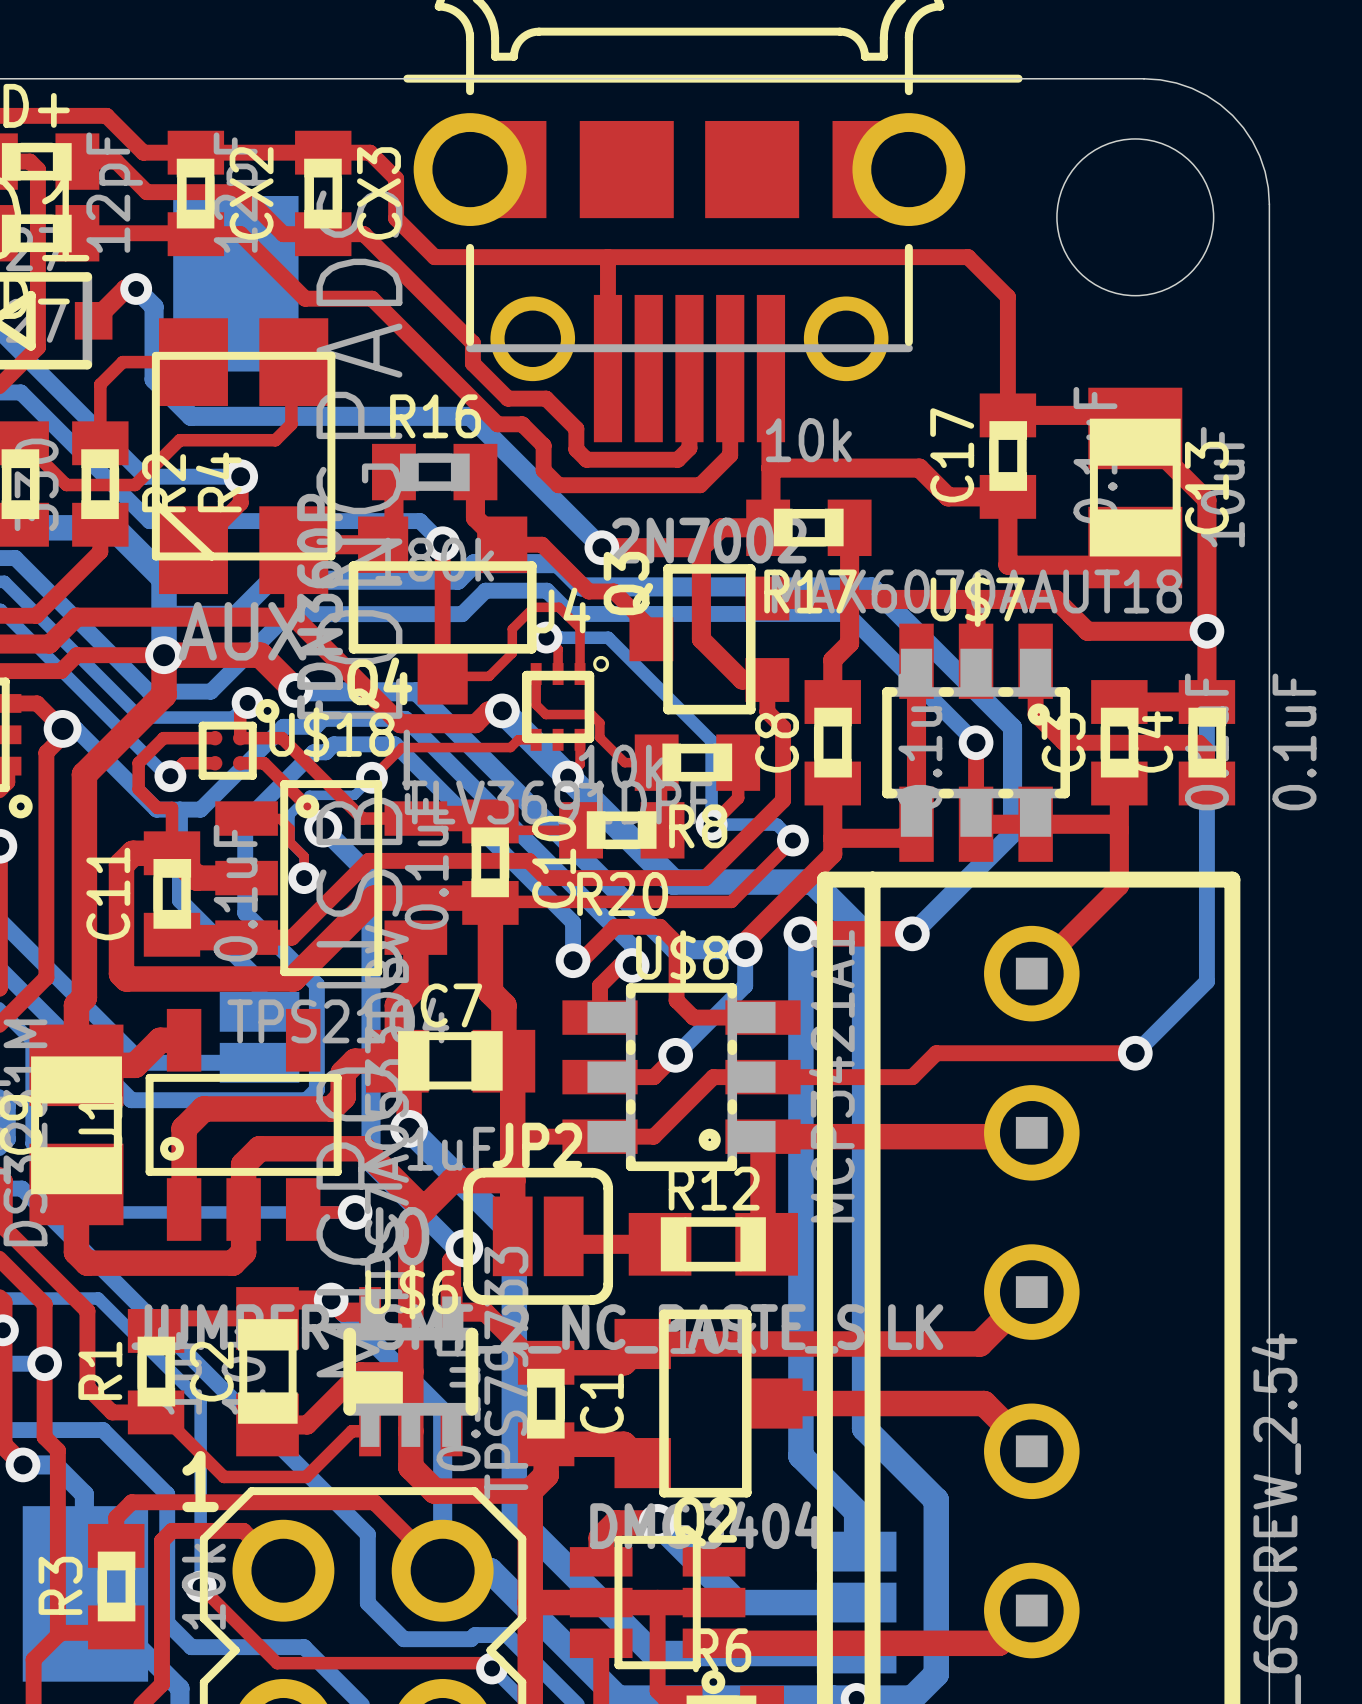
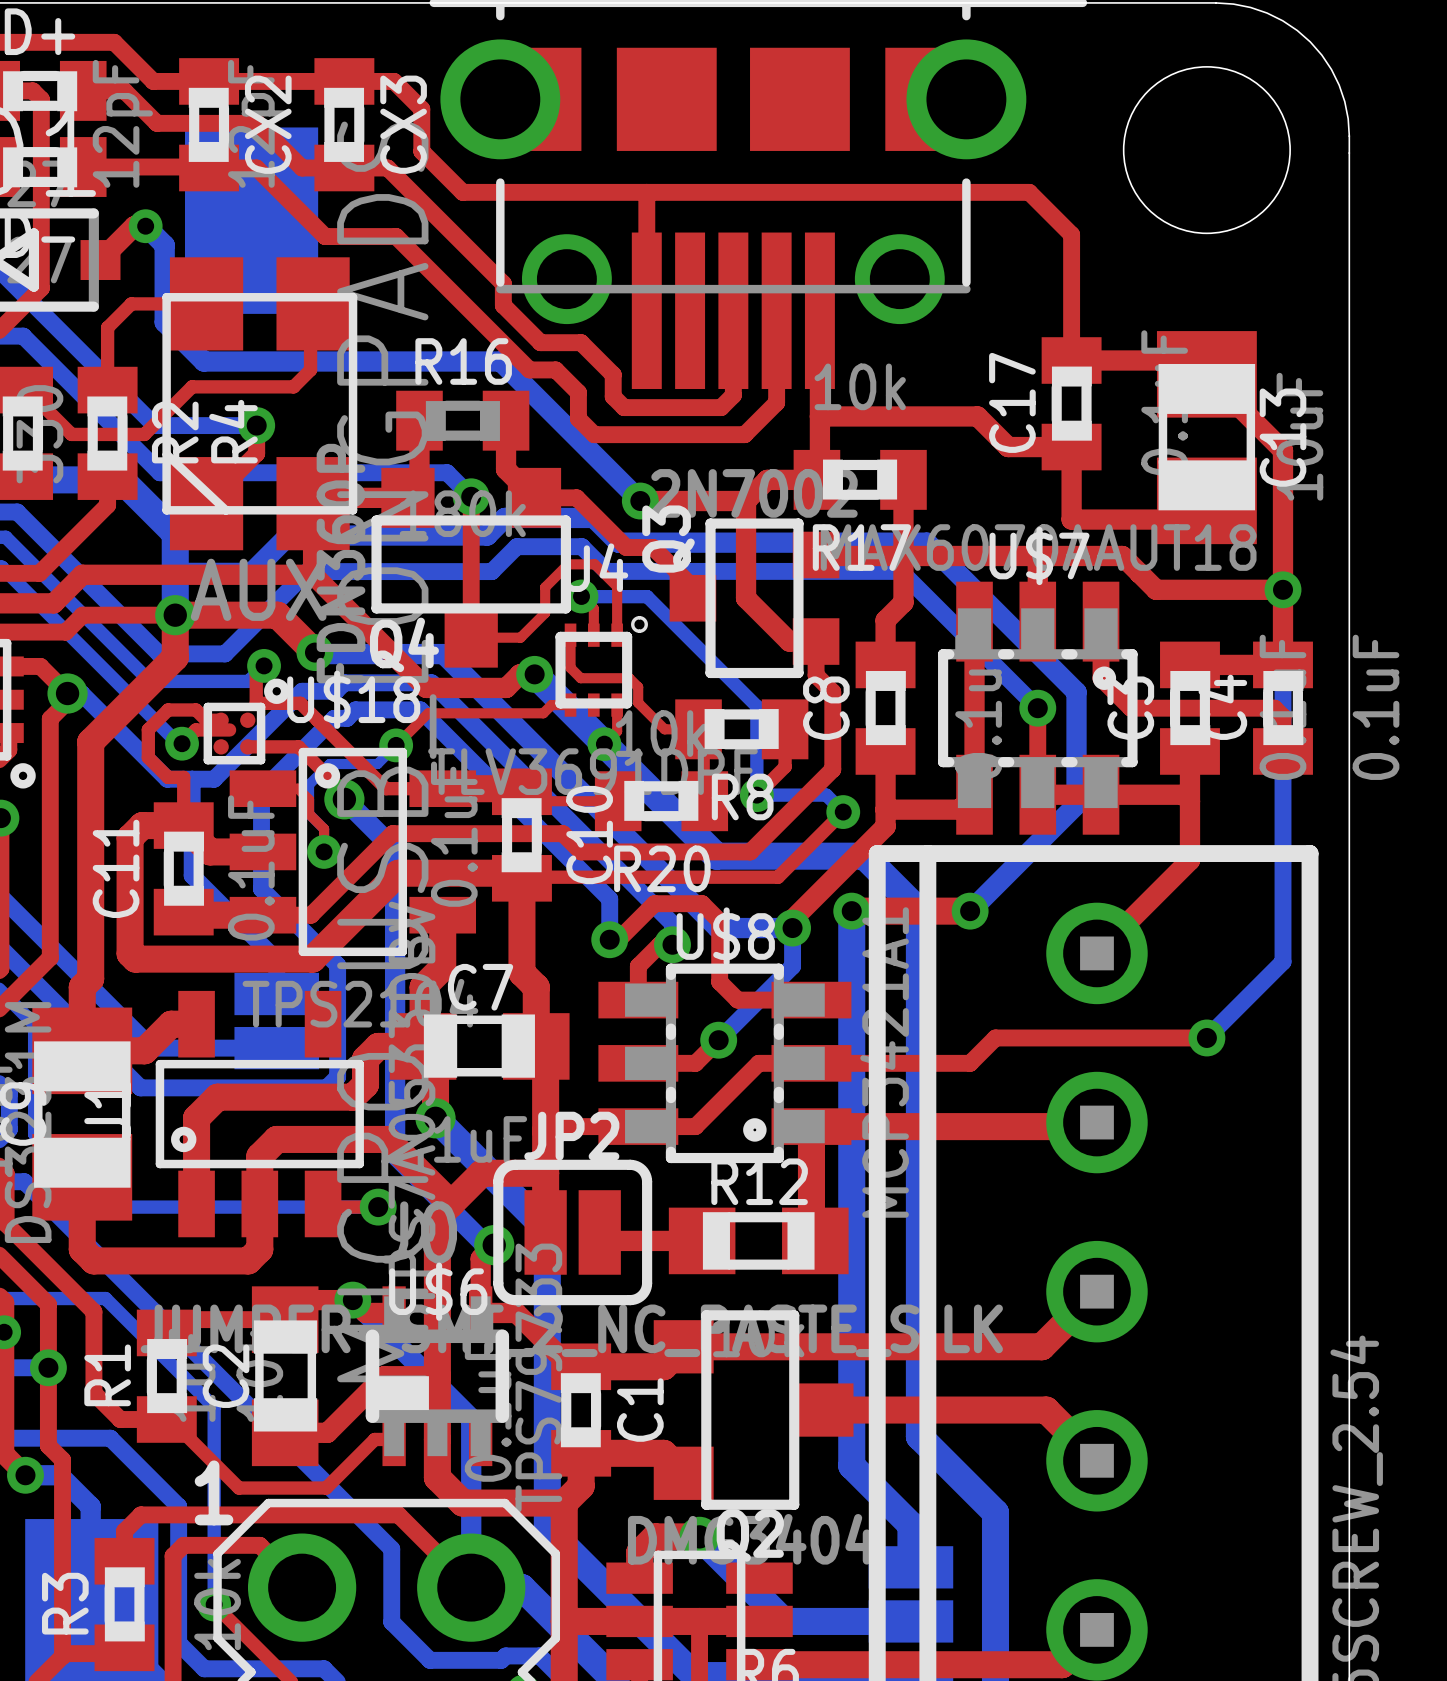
top track: (215, 738) (163, 738) (157, 744) -> (221, 720) (206, 720) (196, 709) (168, 709)
part position: (239, 739) -> (246, 721)
top track: (240, 763) (264, 763) (280, 779) -> (247, 746) (298, 746)

